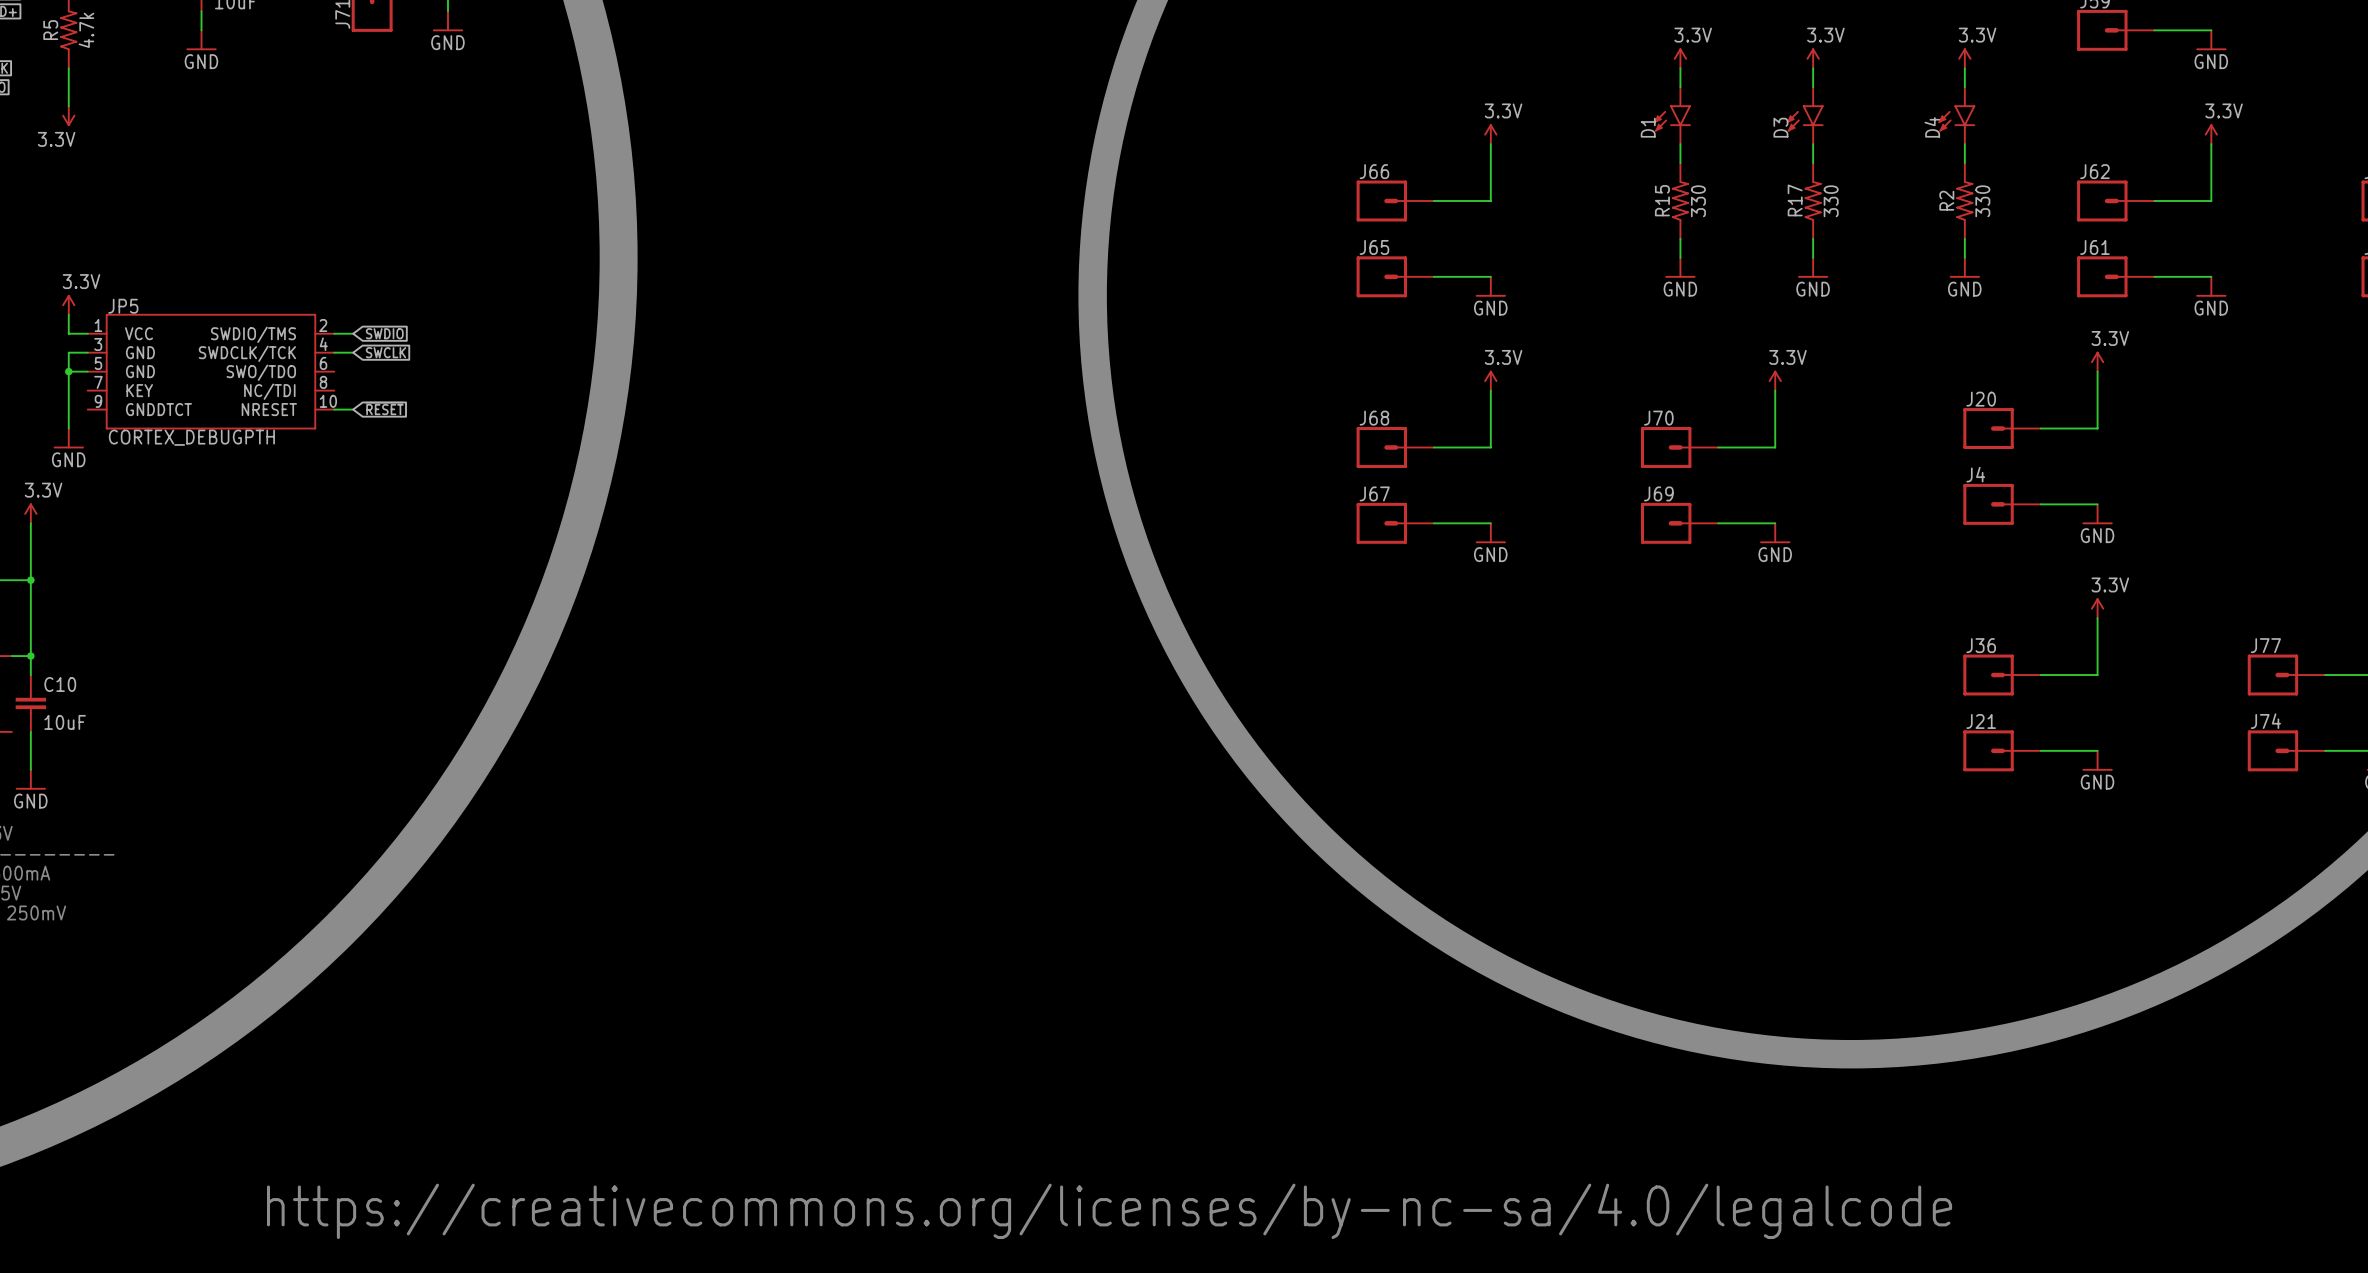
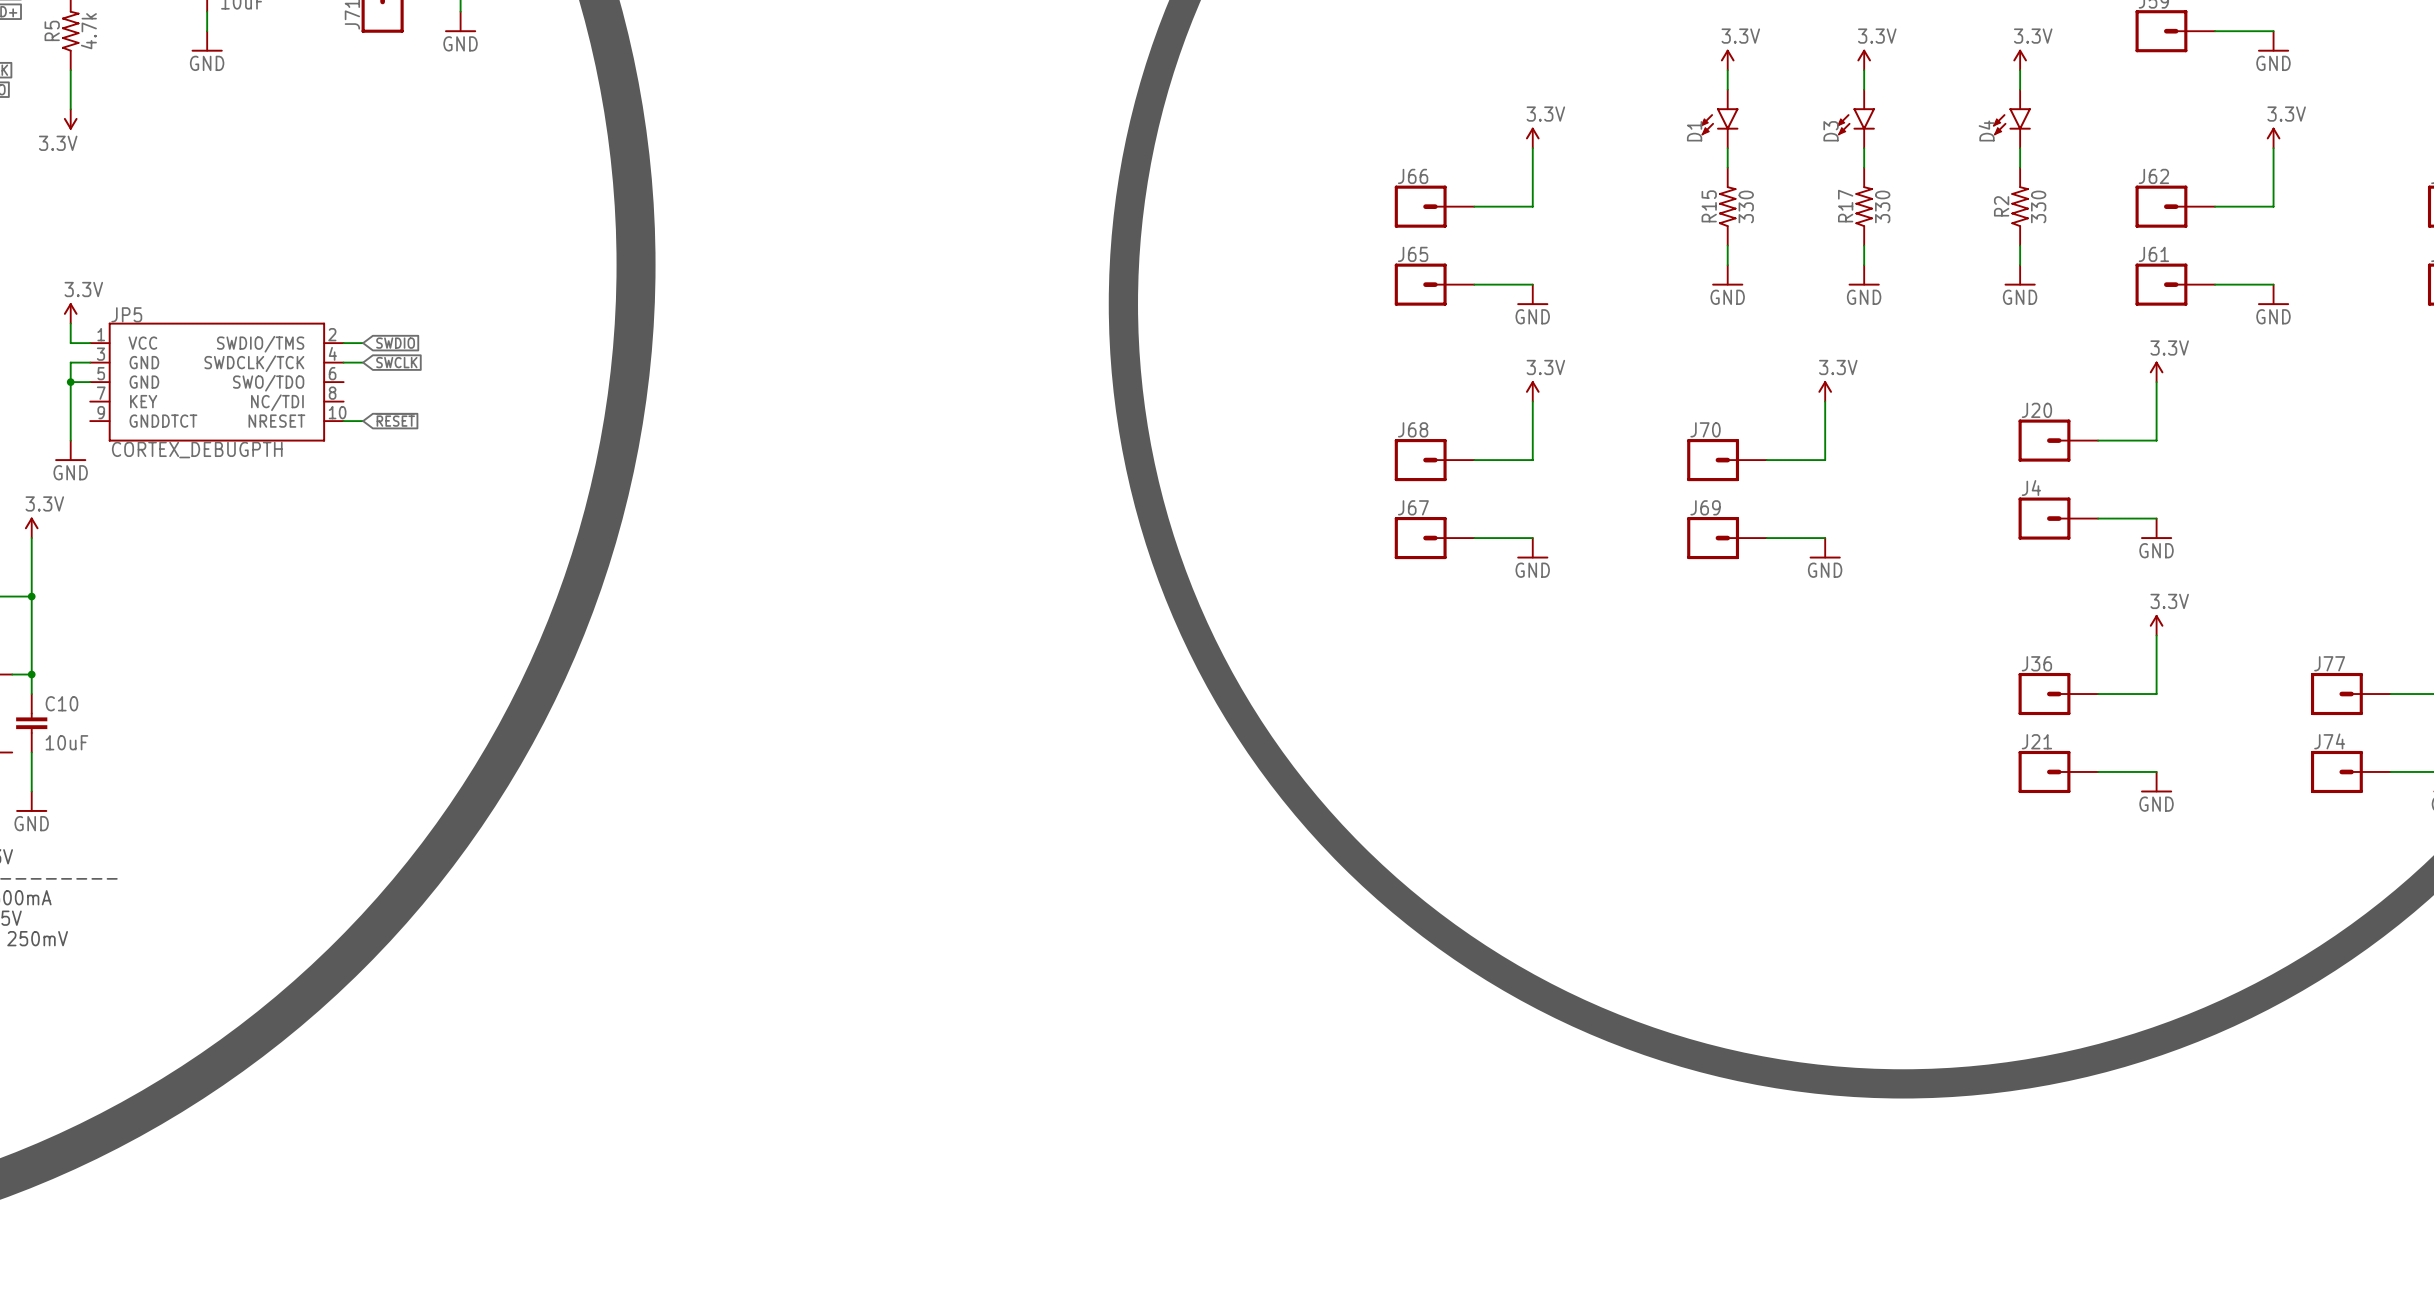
text: https://creativecommons.org/licenses/by-nc-sa/4.0/legalcode (1109, 1211) -> none

